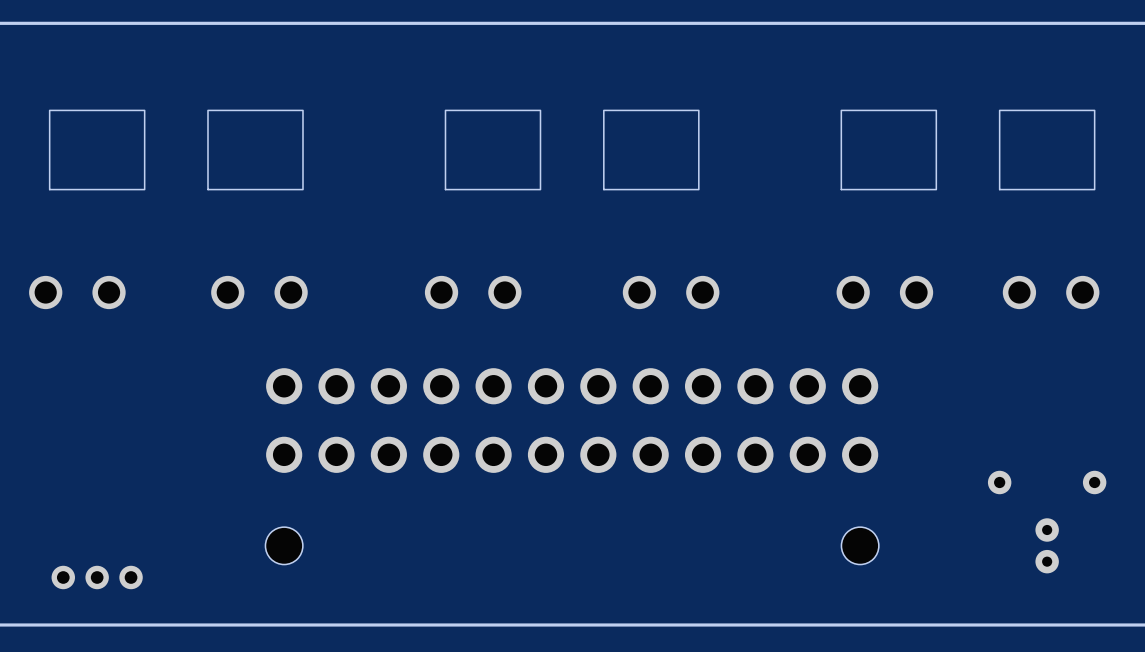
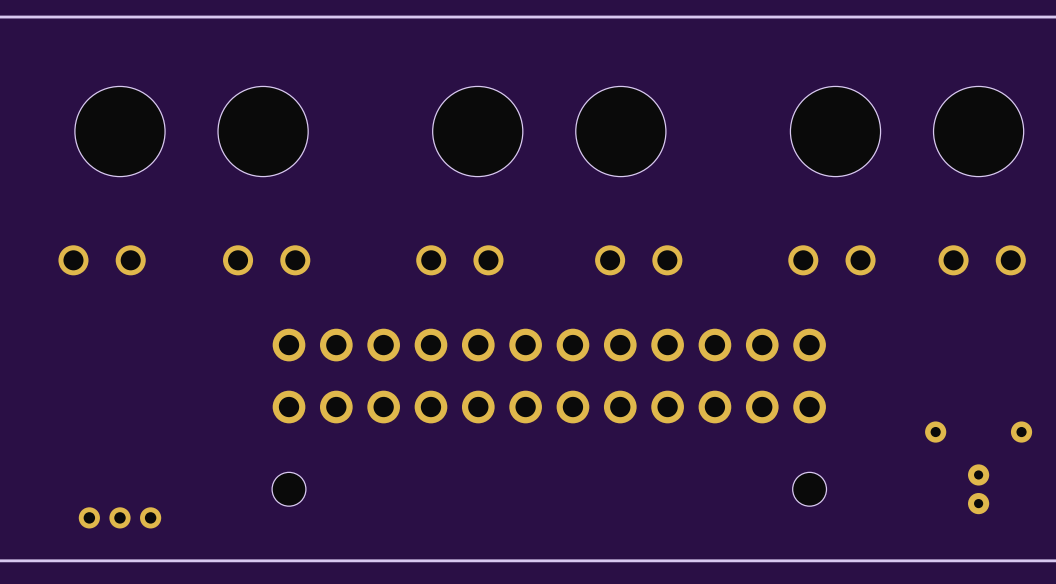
drawing: [49, 110, 145, 190] -> none
drawing: [207, 110, 303, 190] -> none
drawing: [445, 110, 541, 190] -> none
drawing: [603, 110, 699, 190] -> none
drawing: [841, 110, 937, 190] -> none
drawing: [999, 110, 1095, 190] -> none
part: none -> (119, 131)
part: none -> (263, 131)
part: none -> (477, 131)
part: none -> (620, 131)
part: none -> (835, 131)
part: none -> (978, 131)

